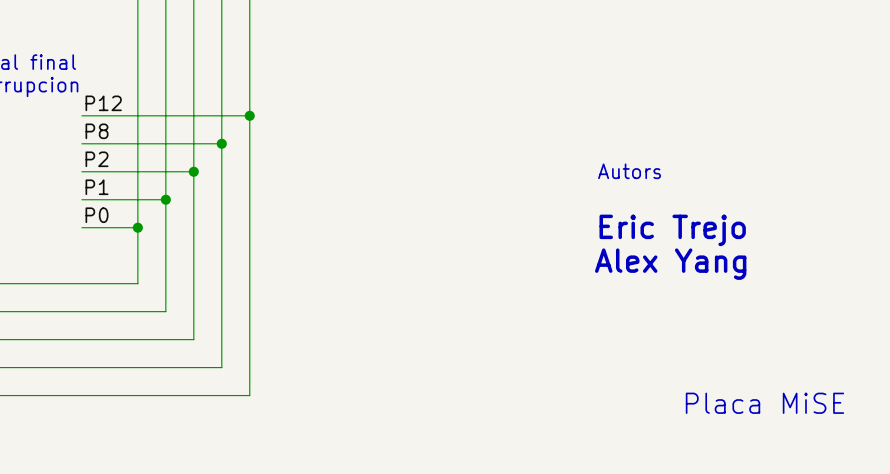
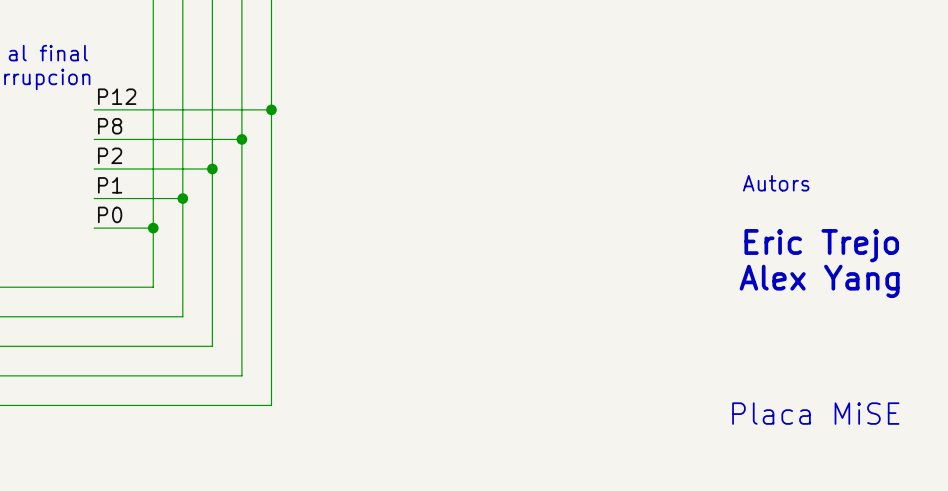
text position: Autors (629, 171) -> Autors (776, 183)
text position: Eric Trejo (672, 230) -> Eric Trejo (821, 245)
text position: Alex Yang (670, 264) -> Alex Yang (819, 281)

